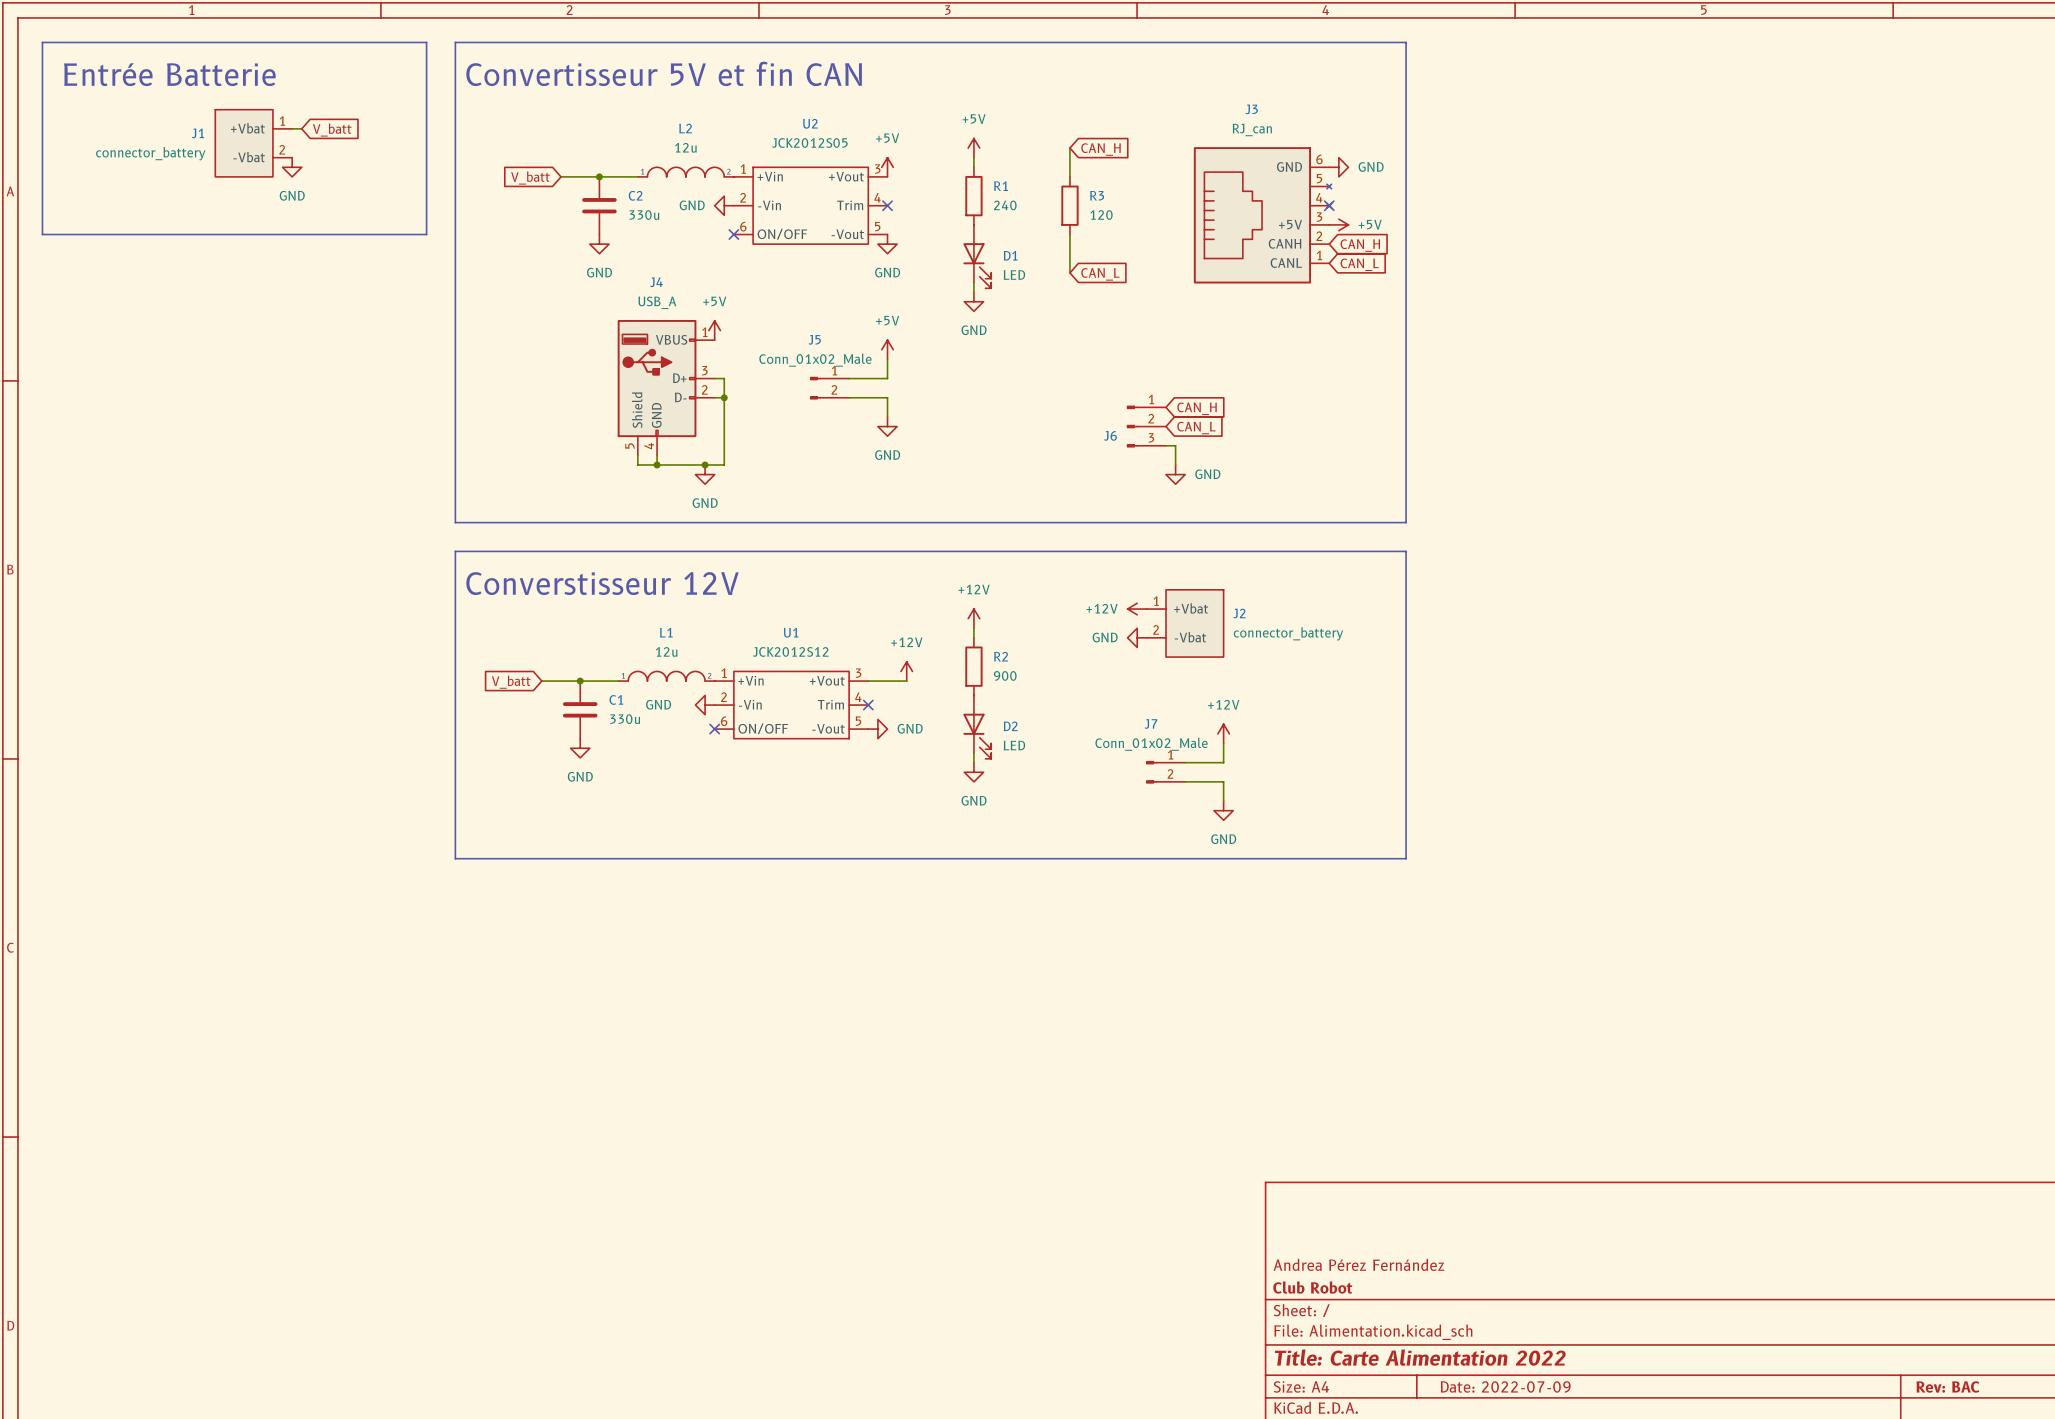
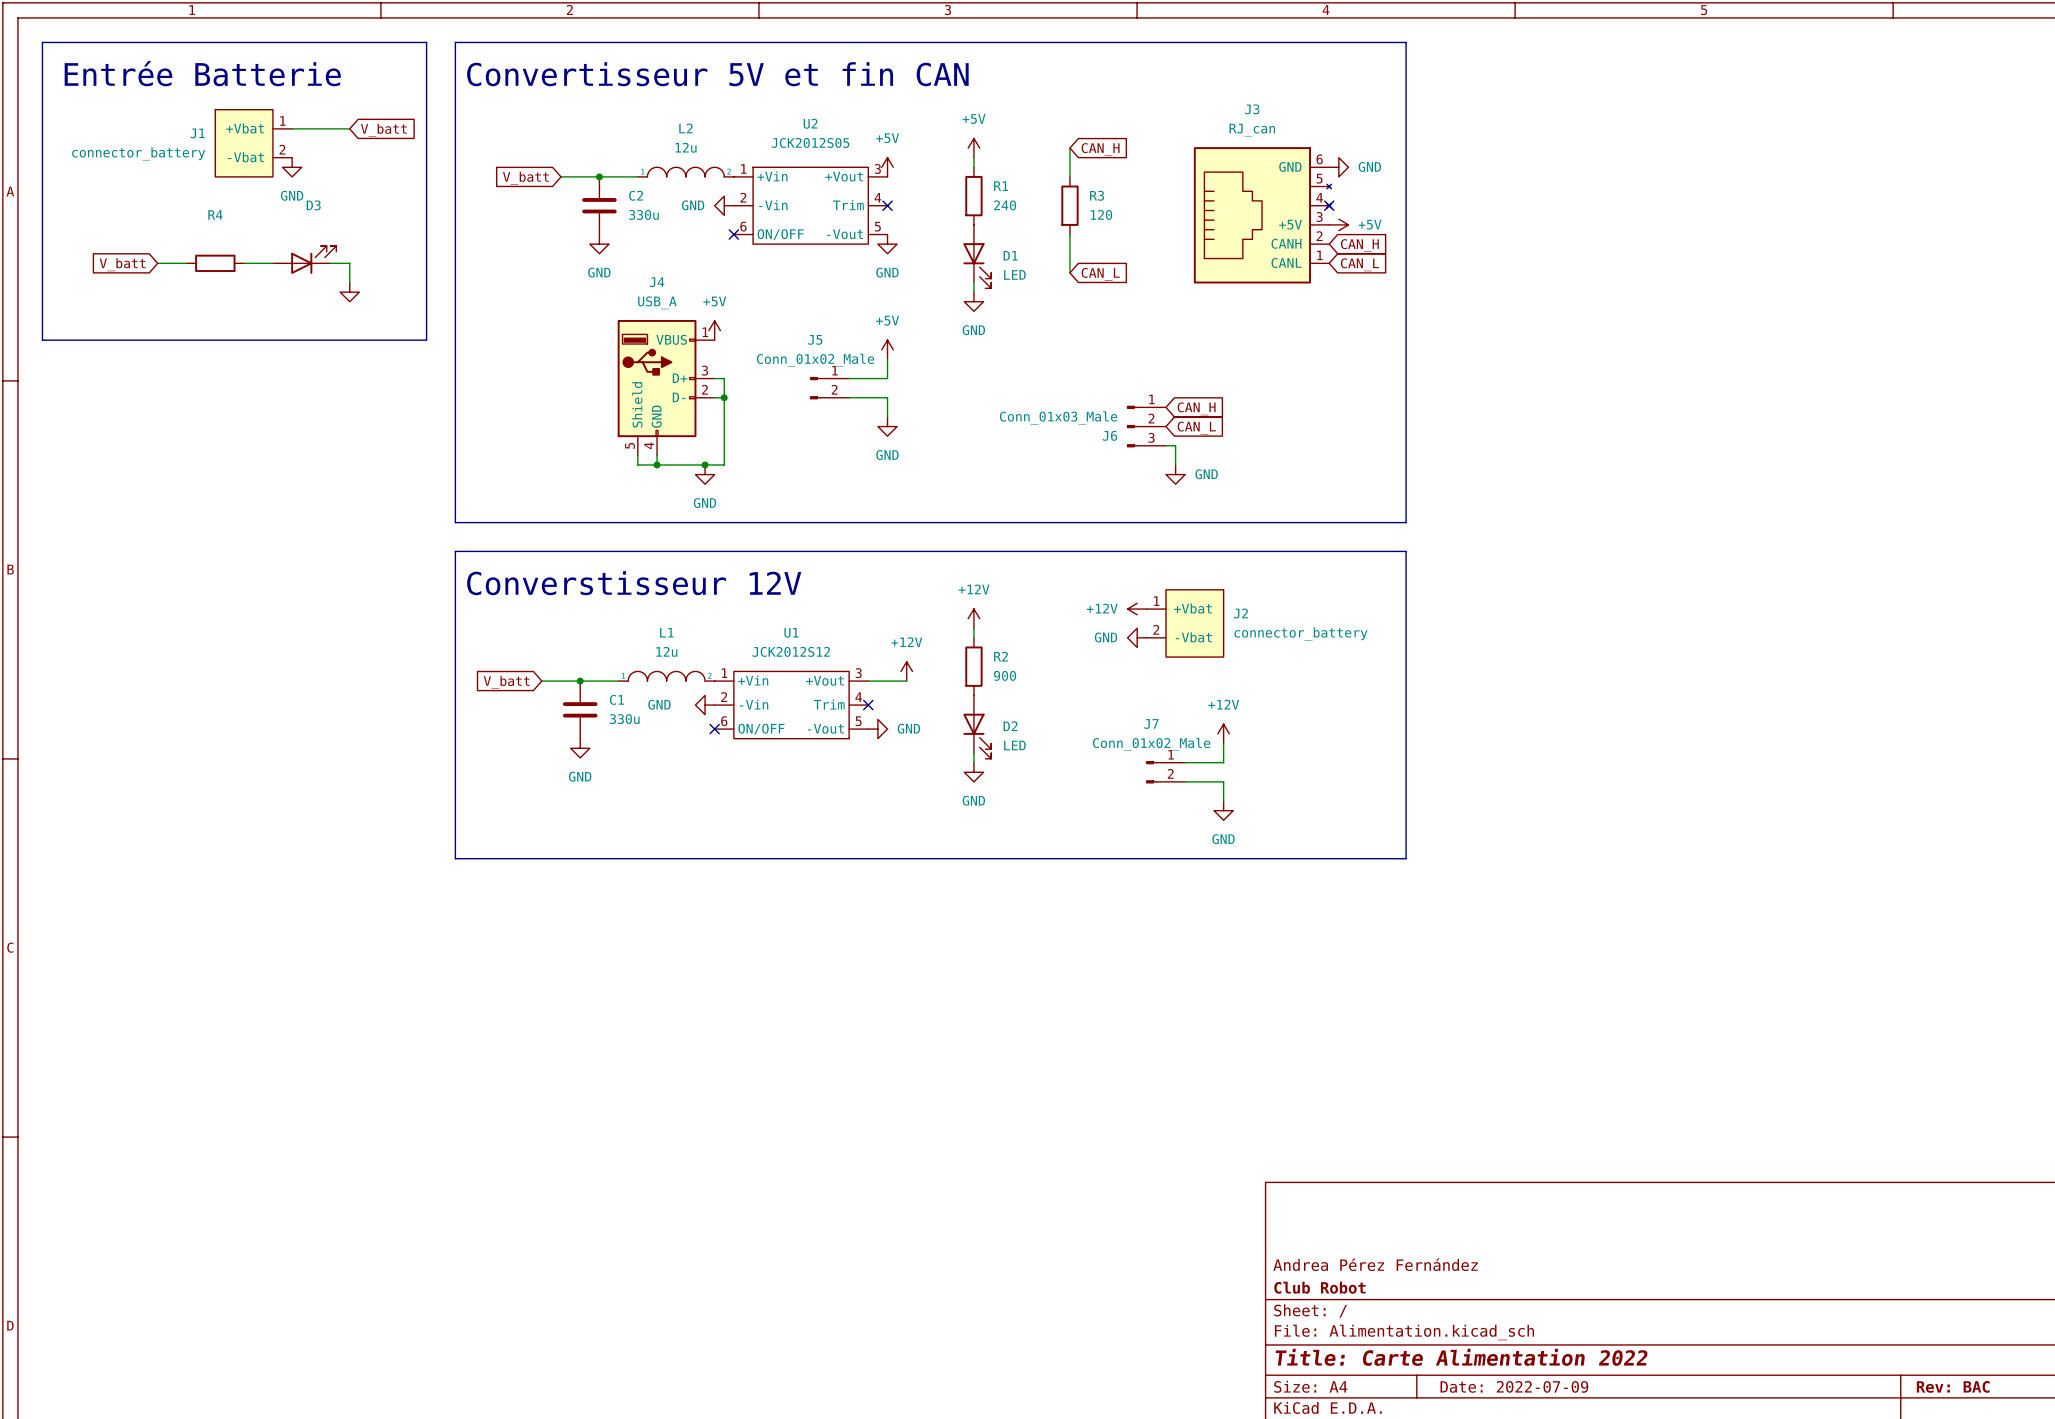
wire: none -> (301, 128) (349, 128)
global label position: V_batt (332, 130) -> V_batt (383, 130)
line: (42, 234) (426, 234) -> (42, 234) (42, 340) (426, 340) (426, 234)
D3: none -> (304, 259)
wire: none -> (157, 263) (186, 263)
R4: none -> (215, 263)
wire: none -> (244, 263) (272, 263)
wire: none -> (330, 263) (349, 263) (349, 282)
global label: none -> V_batt (122, 264)
power symbol: none -> (349, 292)
J6 value: none -> Conn_01x03_Male (1058, 417)

